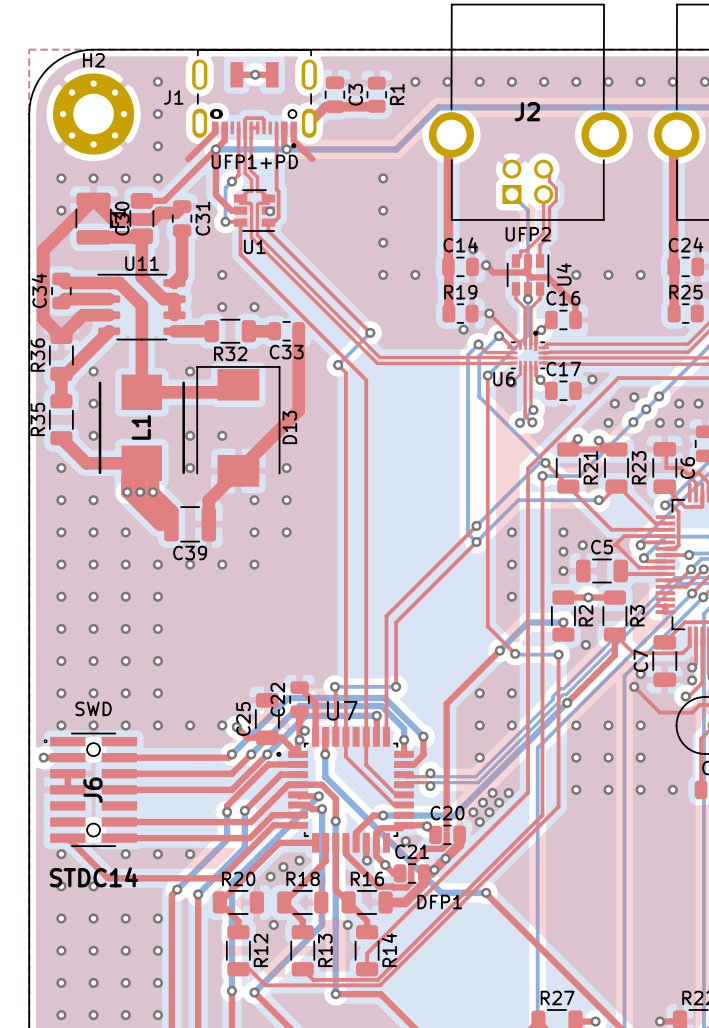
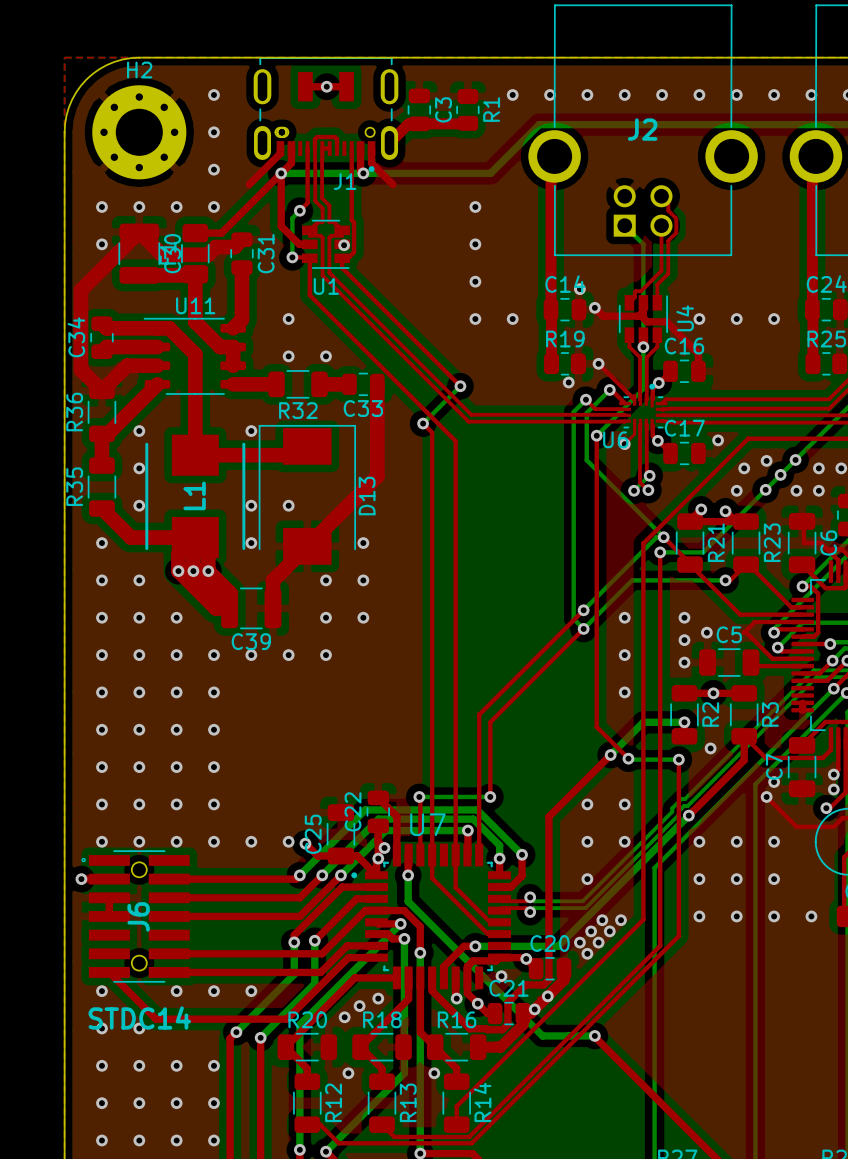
J1 name position: J1 (173, 97) -> J1 (345, 181)
text: UFP1+PD (254, 161) -> none
text: UFP2 (528, 234) -> none
text: SWD (93, 708) -> none
text: DFP1 (439, 901) -> none

